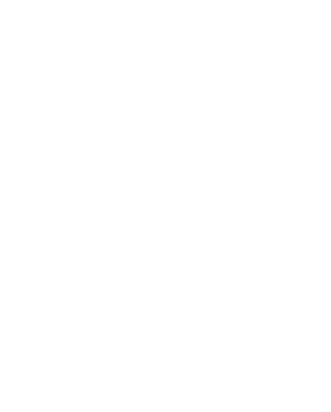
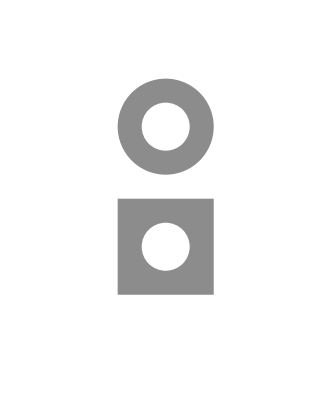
part: none -> (165, 186)

